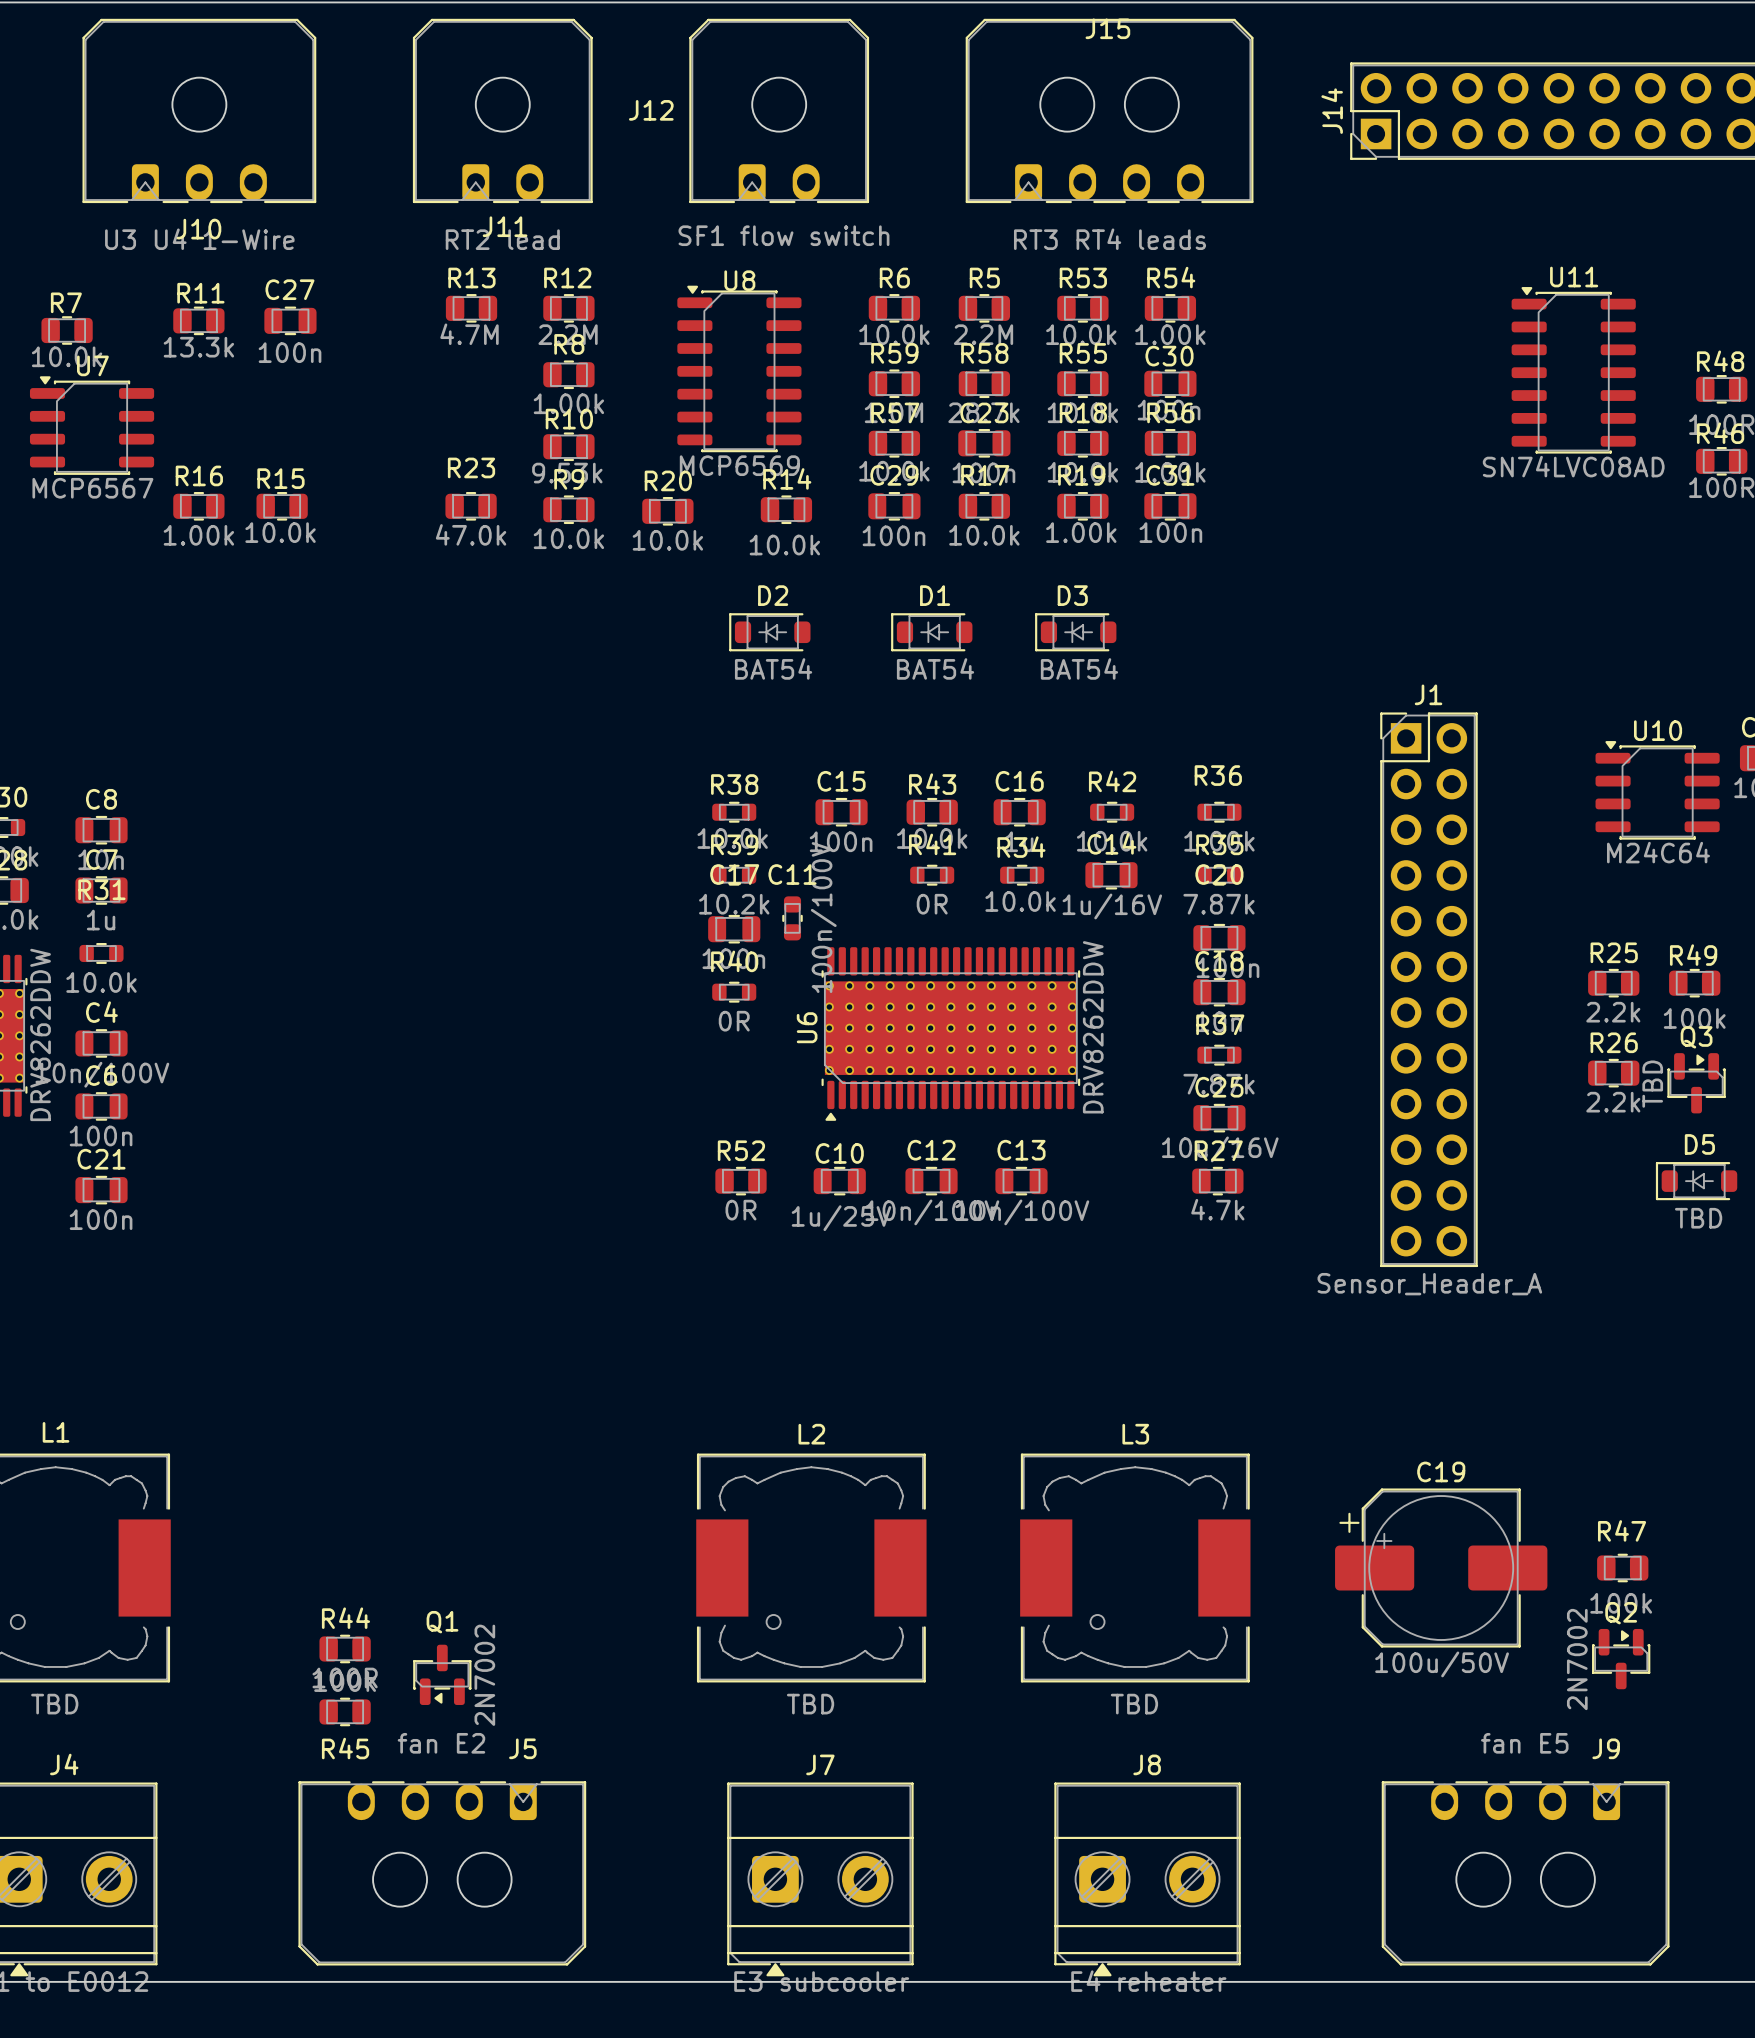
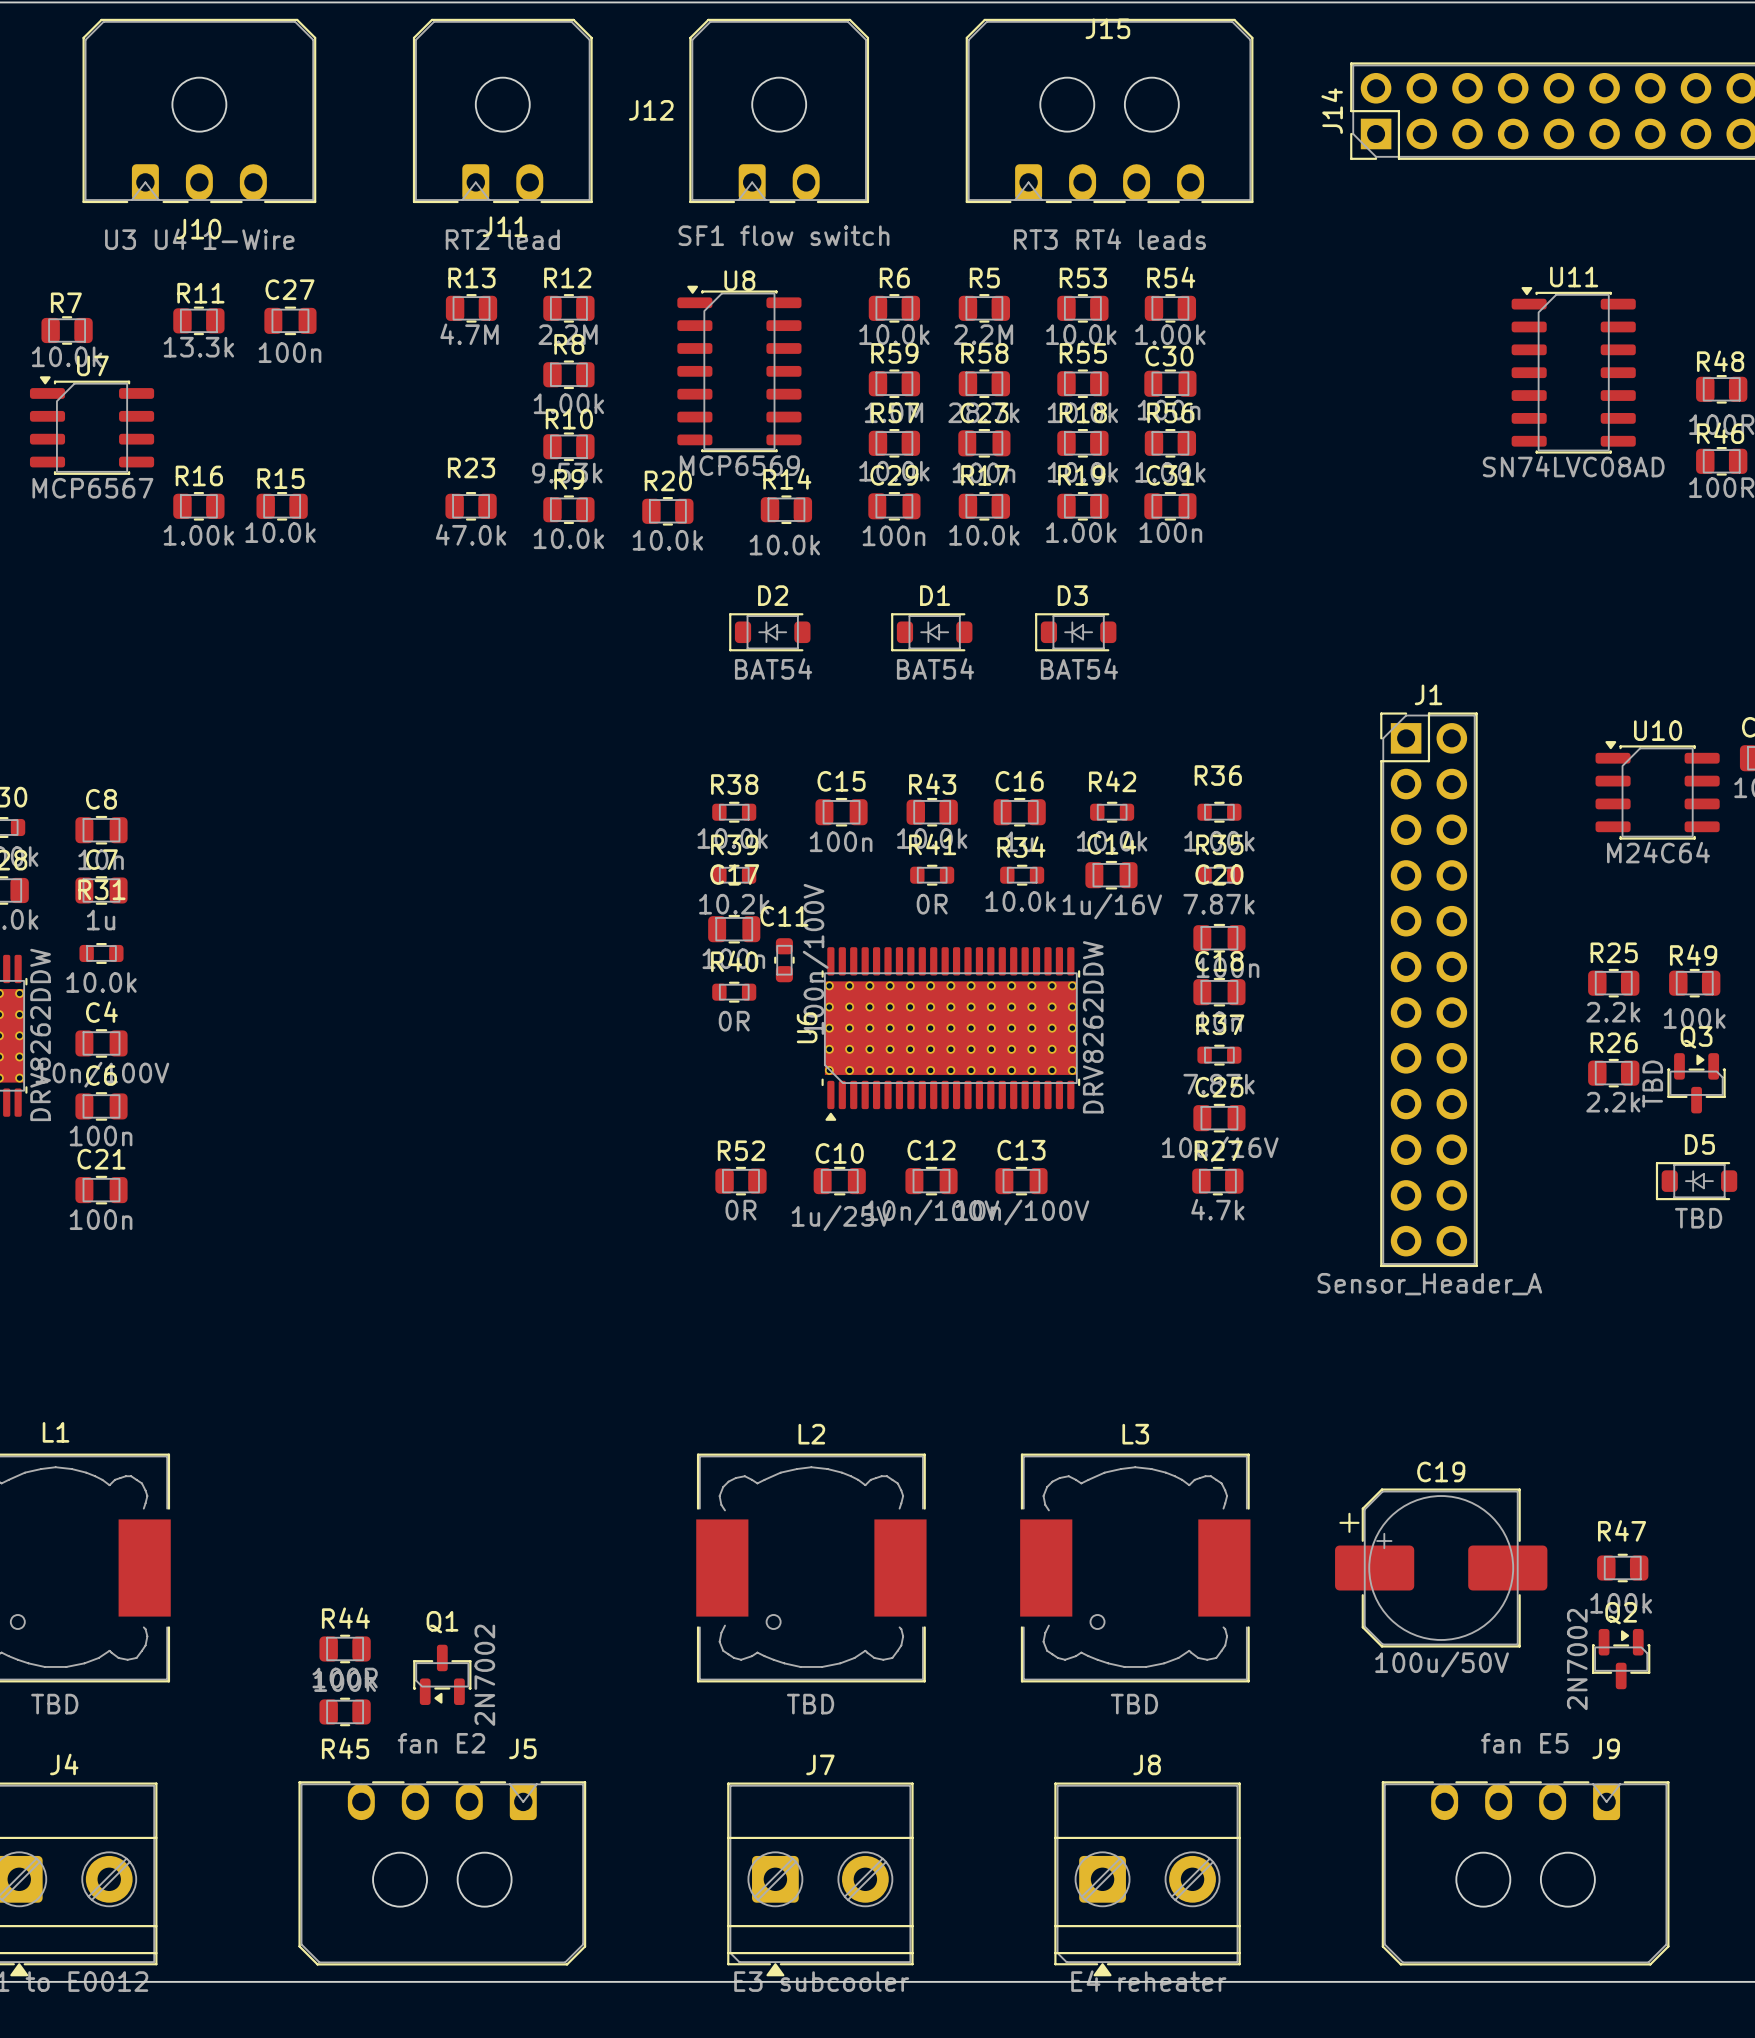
C11 position: (792, 918) -> (784, 960)

